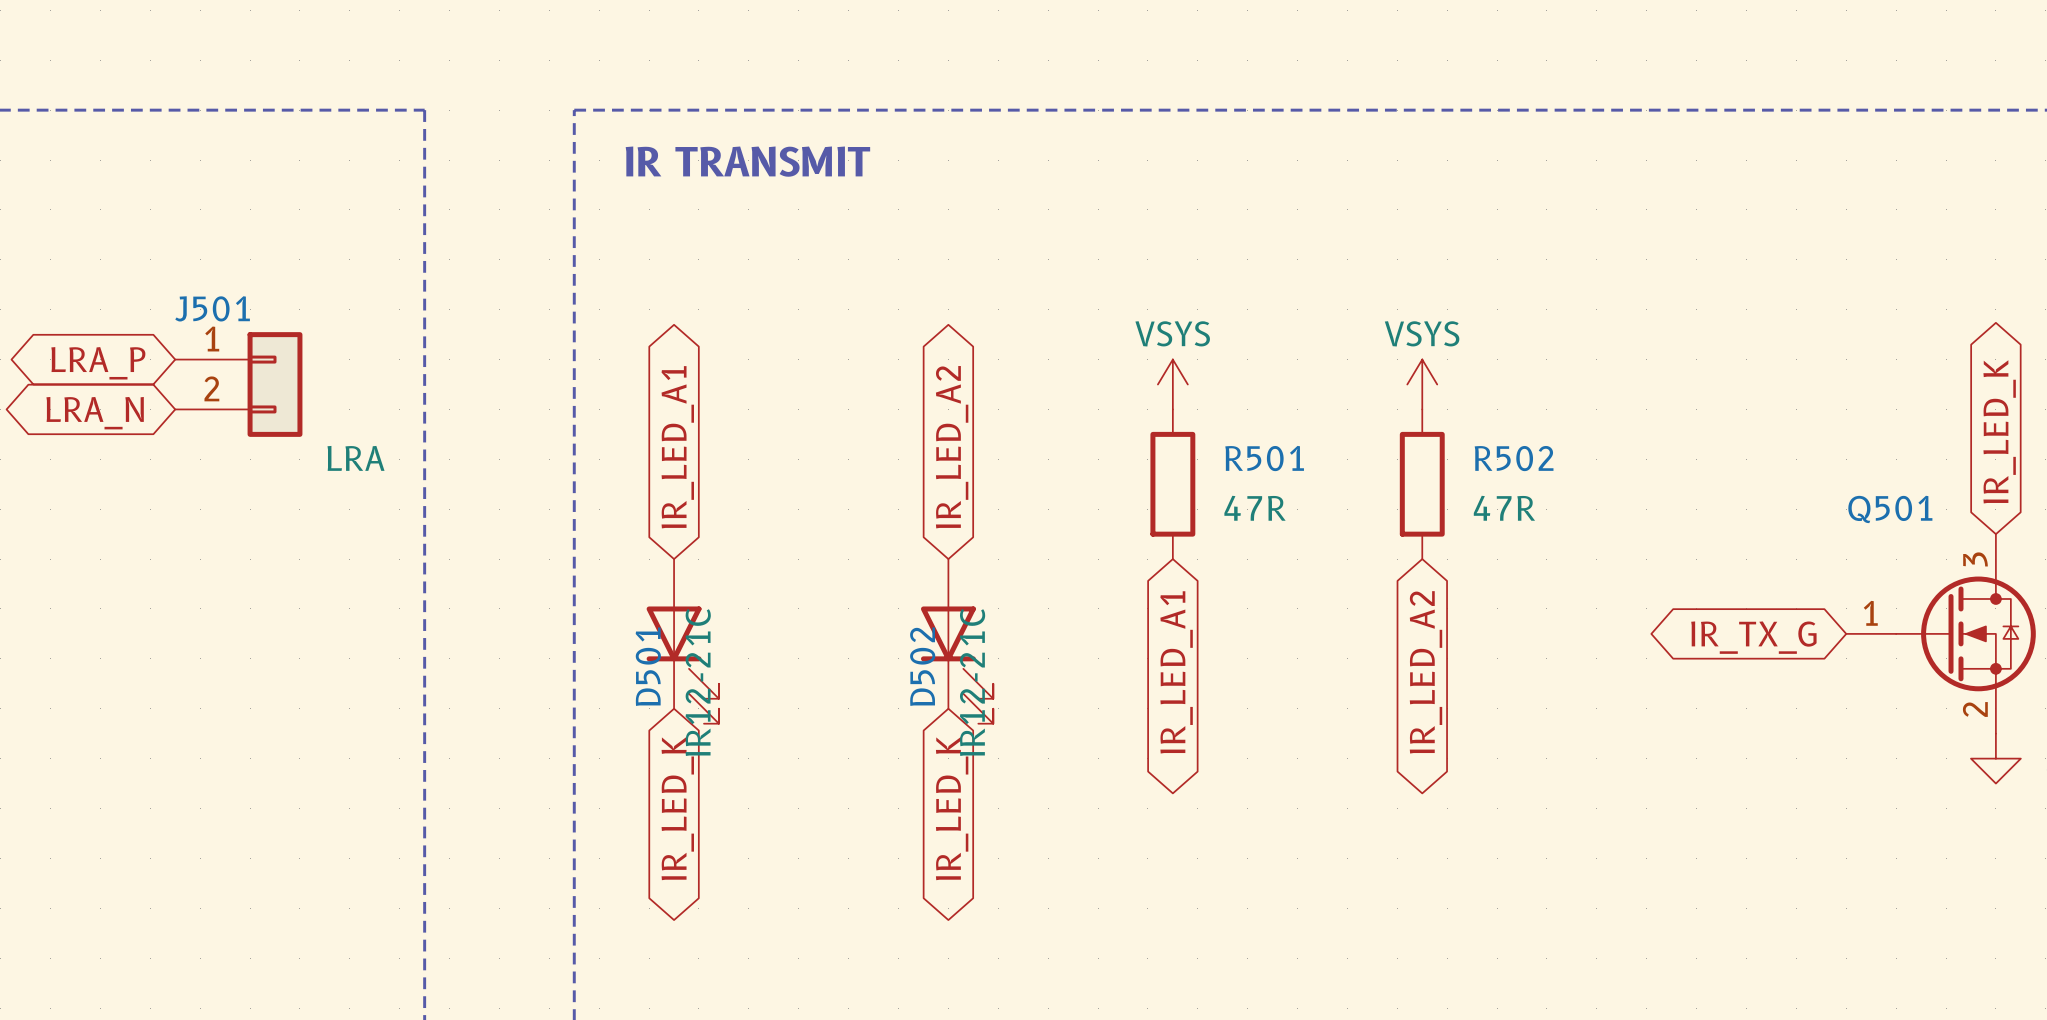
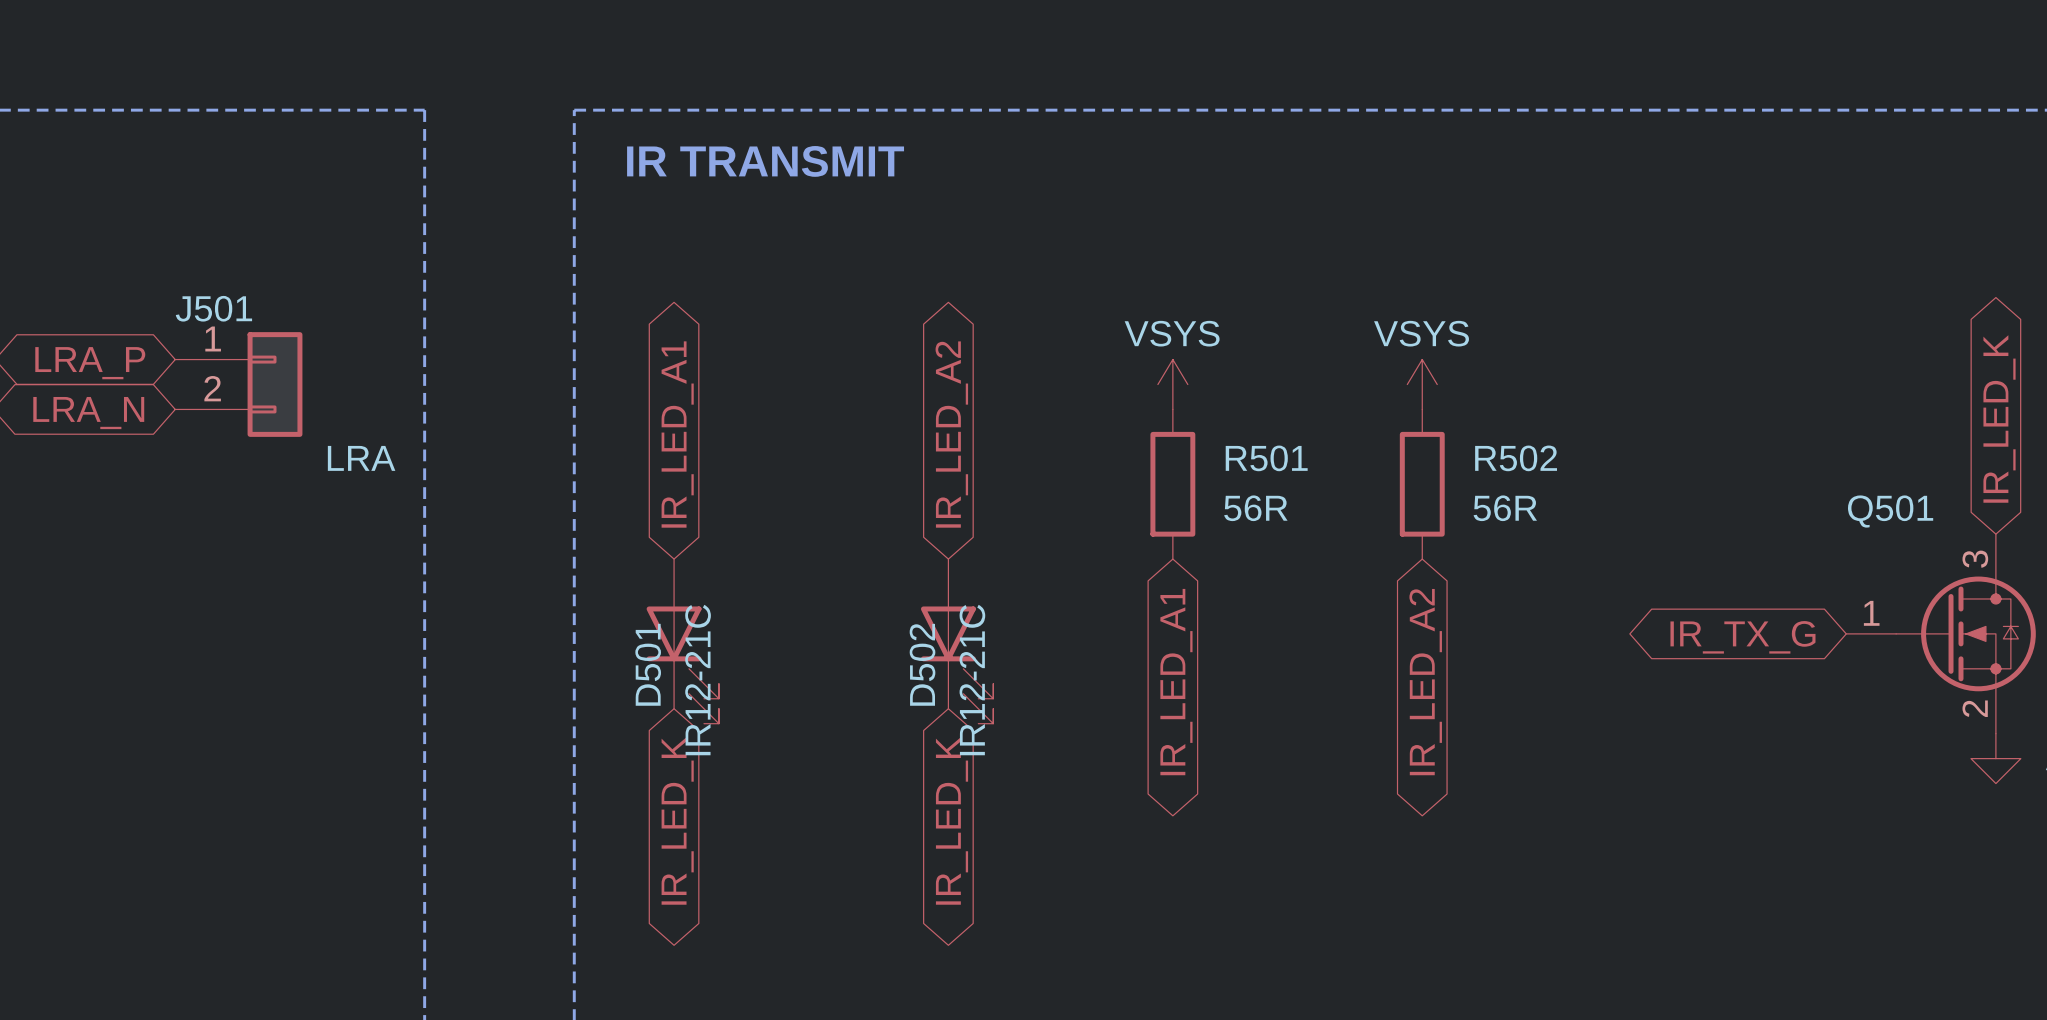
R501 value: 47R (1255, 508) -> 56R (1255, 508)
R502 value: 47R (1504, 508) -> 56R (1505, 508)

